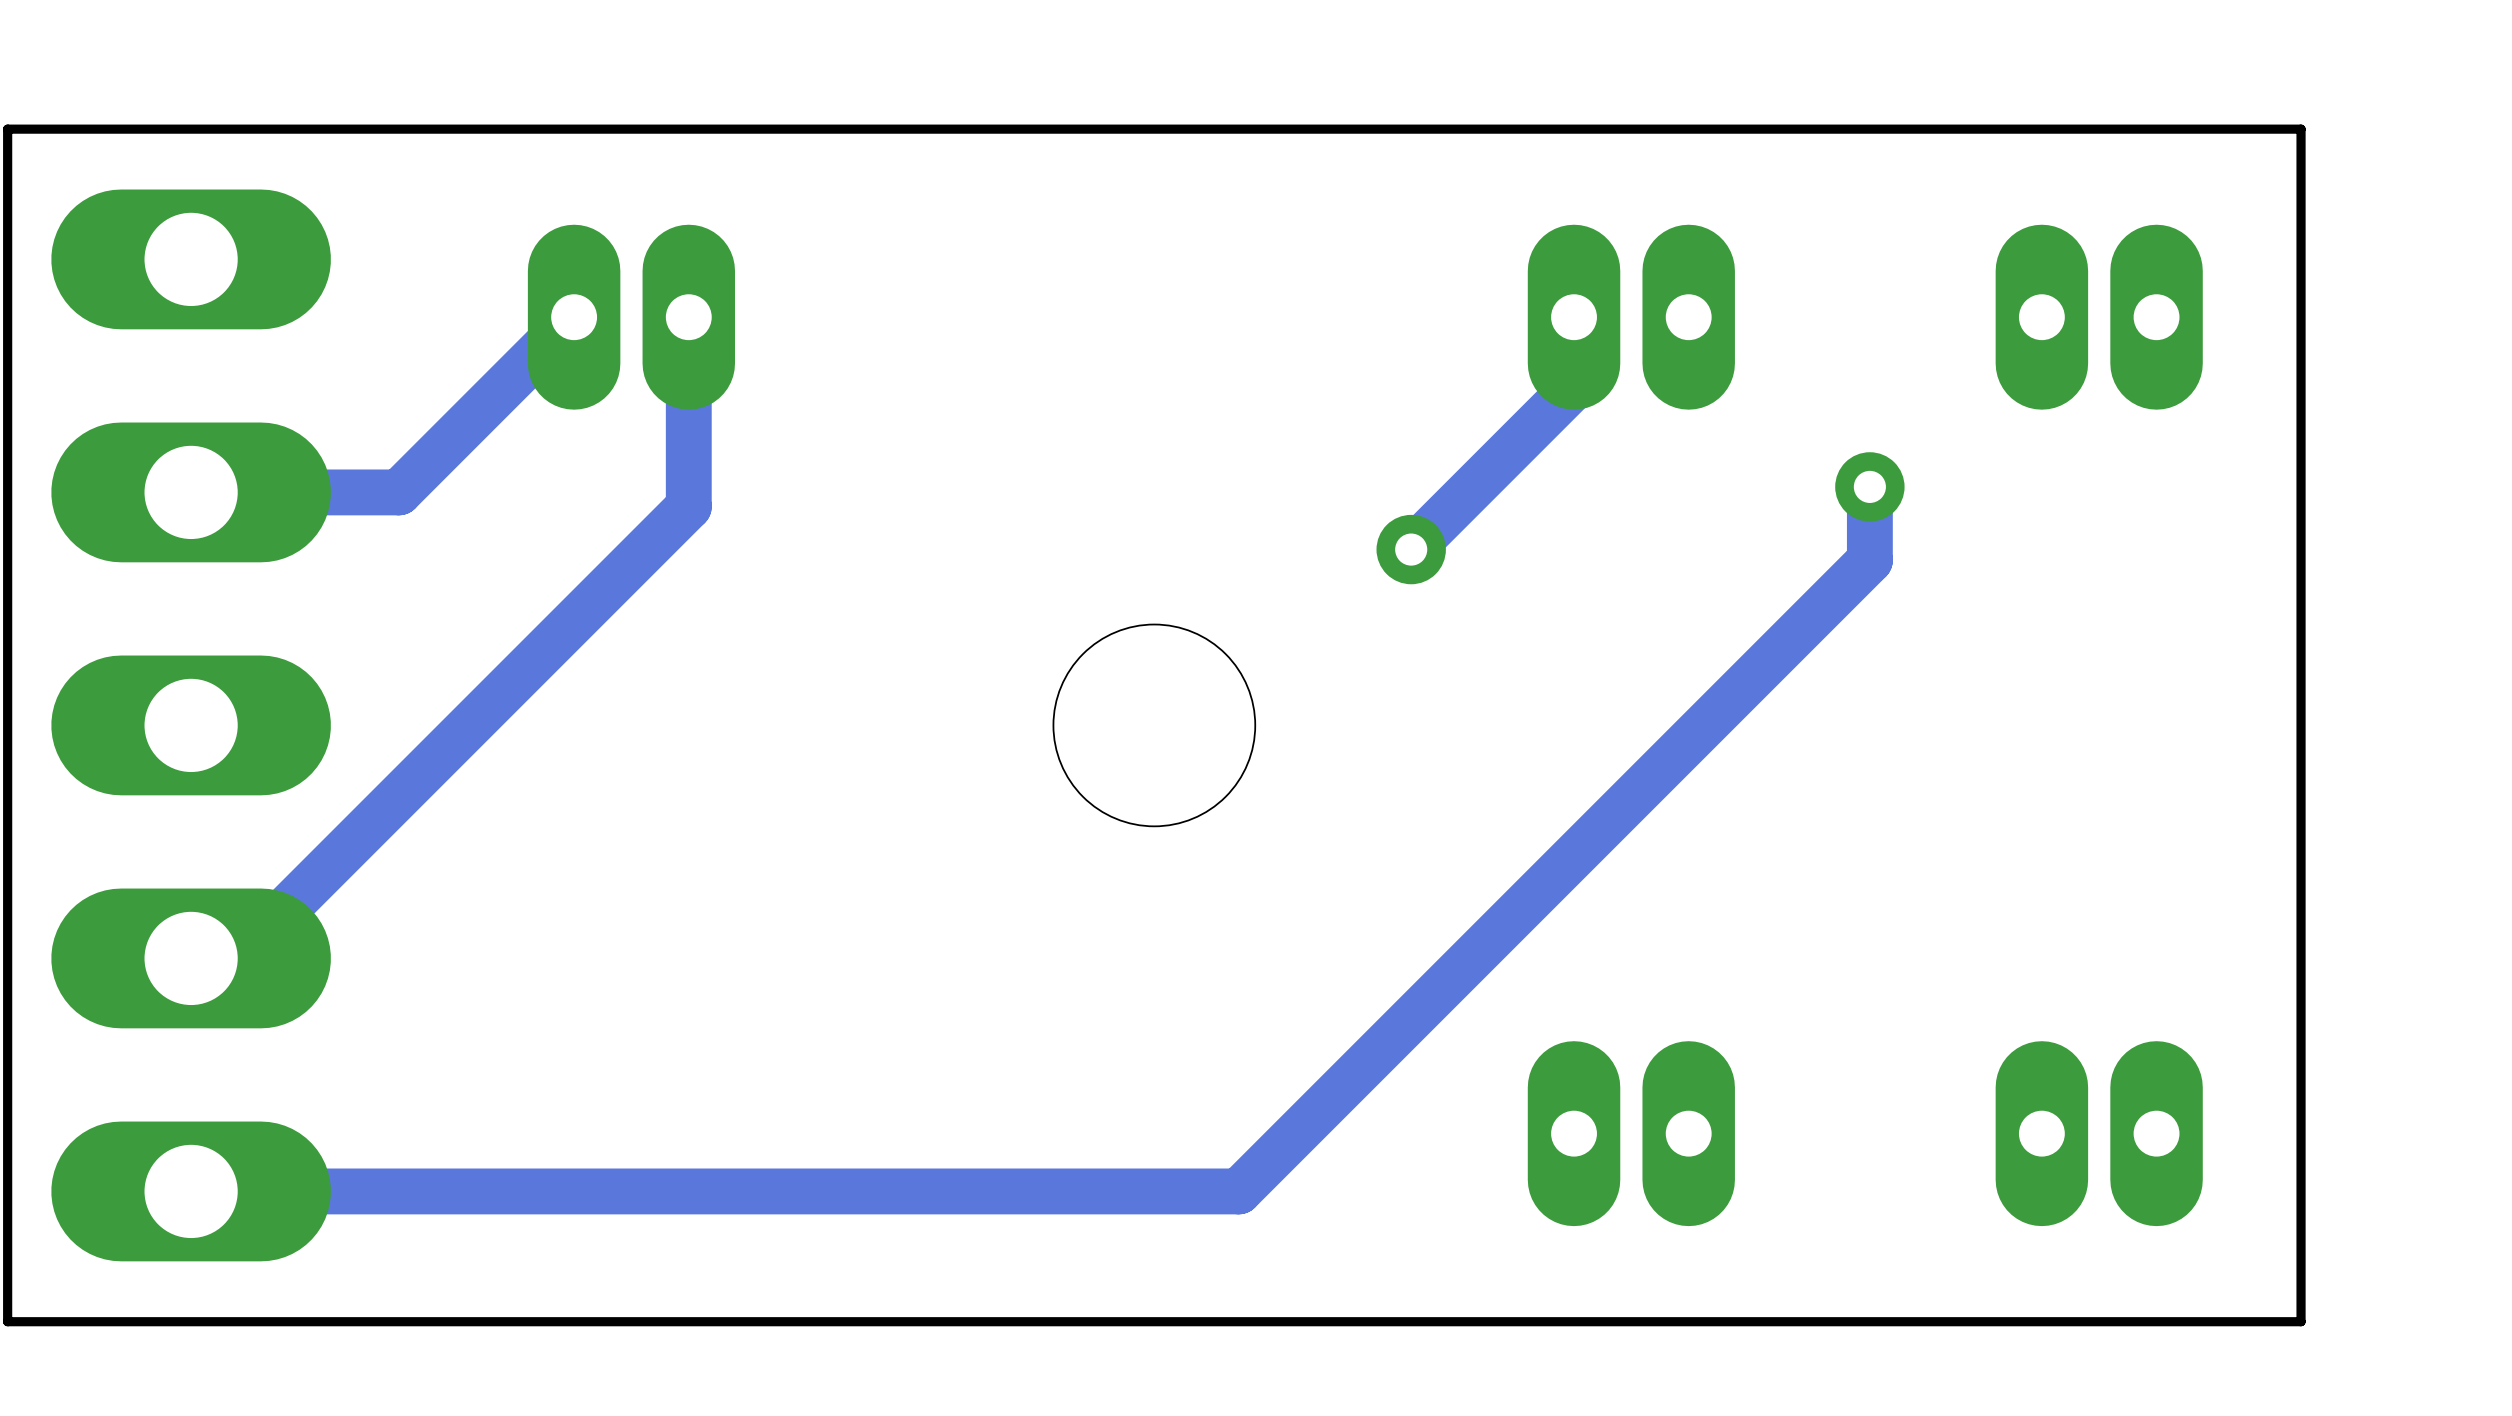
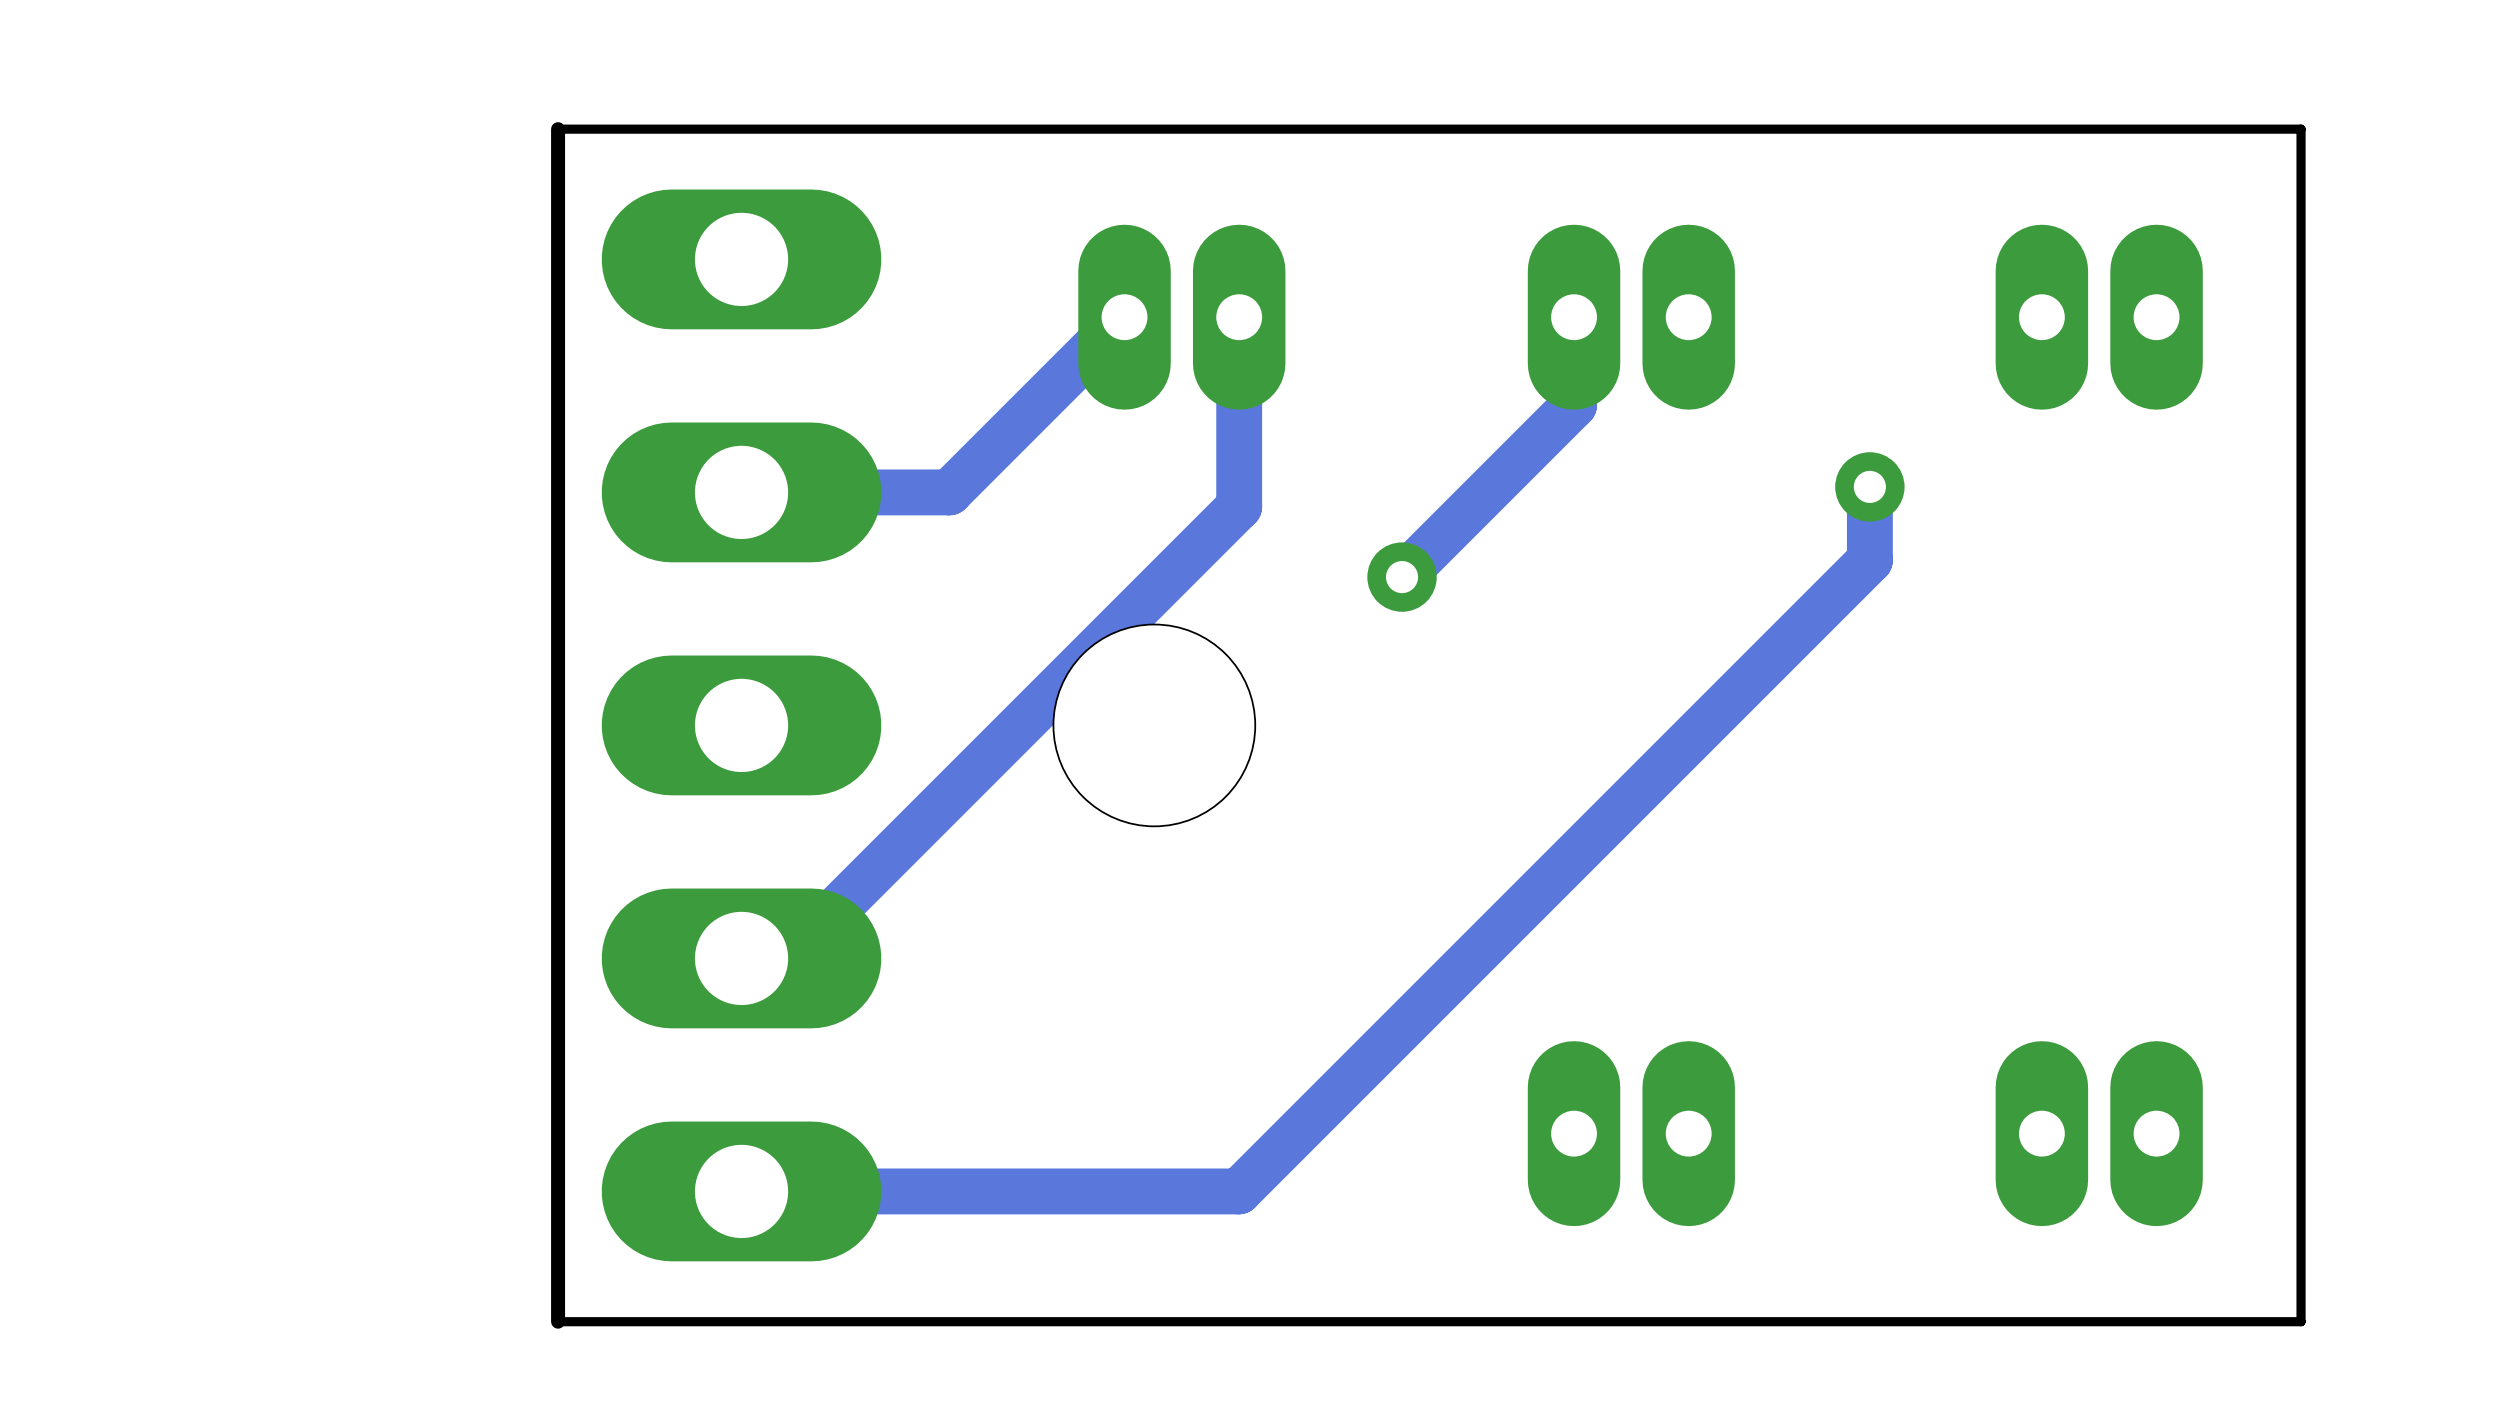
board edge: (558, 129) (7, 129) (7, 1321) (558, 1321) -> (558, 129) (558, 1321)
track: (574, 317) (398, 492) (191, 492) -> (1124, 317) (949, 492) (741, 492)
part position: (631, 317) -> (1181, 317)
track: (688, 317) (688, 506) (236, 958) (191, 958) -> (1239, 317) (1239, 506) (787, 958) (741, 958)
track: (1574, 386) (1411, 549) -> (1574, 386) (1574, 405) (1402, 577)
via position: (1411, 549) -> (1402, 577)
part position: (191, 725) -> (741, 725)
track: (741, 1191) (191, 1191) -> none

